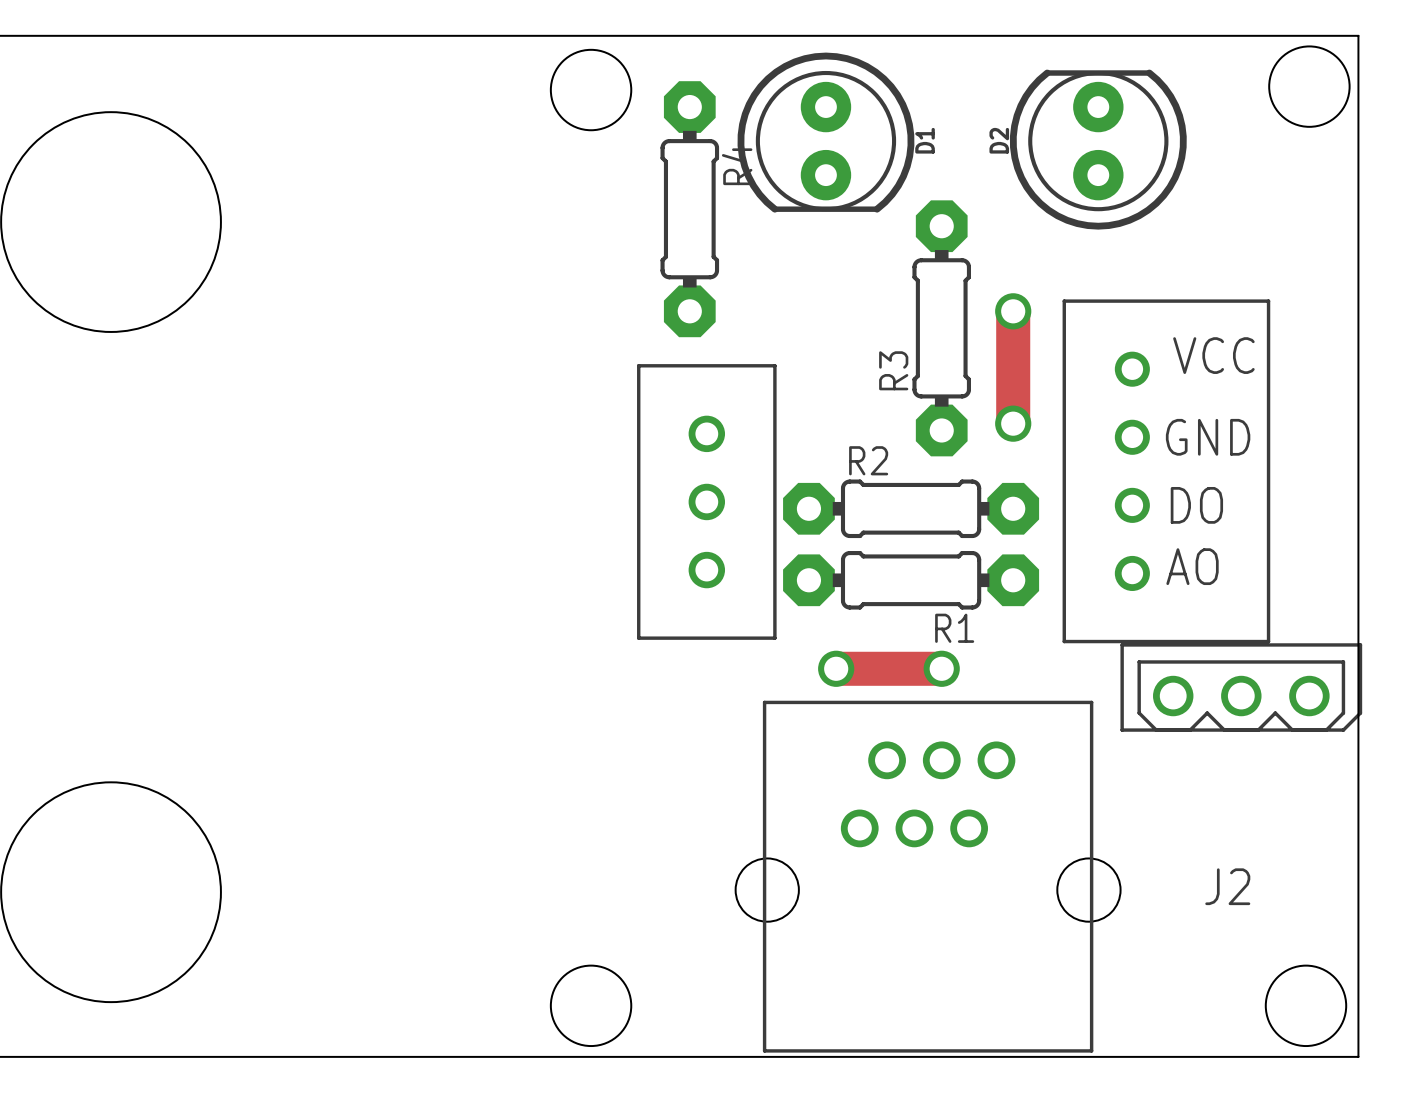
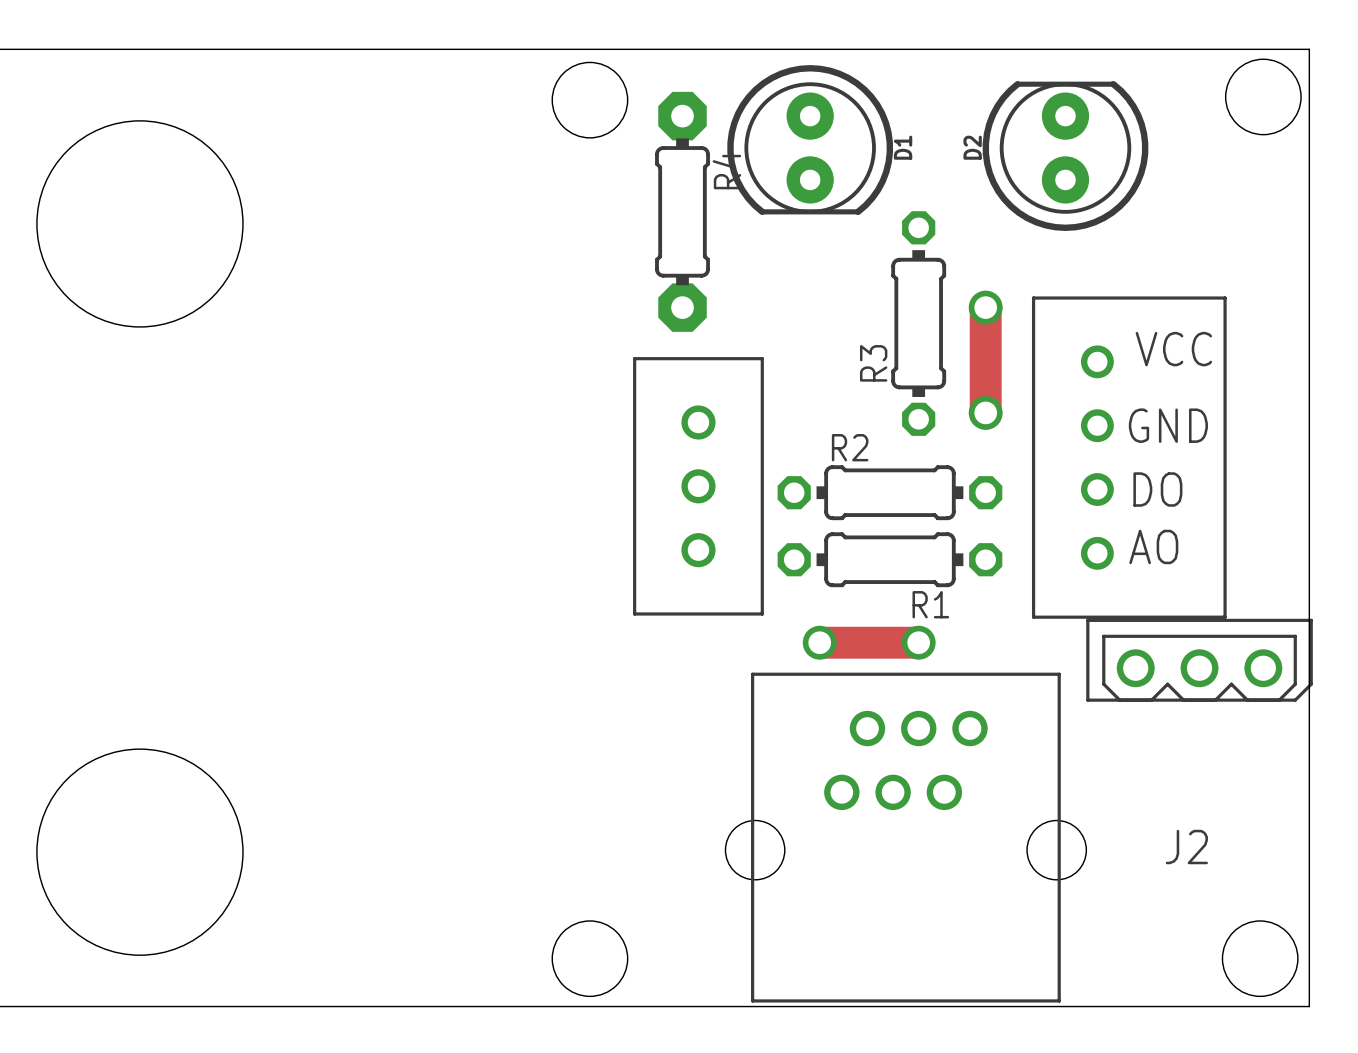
R3 footprint: [912, 200, 972, 457] -> [891, 211, 947, 436]
R2 footprint: [783, 479, 1040, 539] -> [777, 465, 1003, 521]
R1 footprint: [783, 550, 1040, 610] -> [777, 532, 1003, 588]

